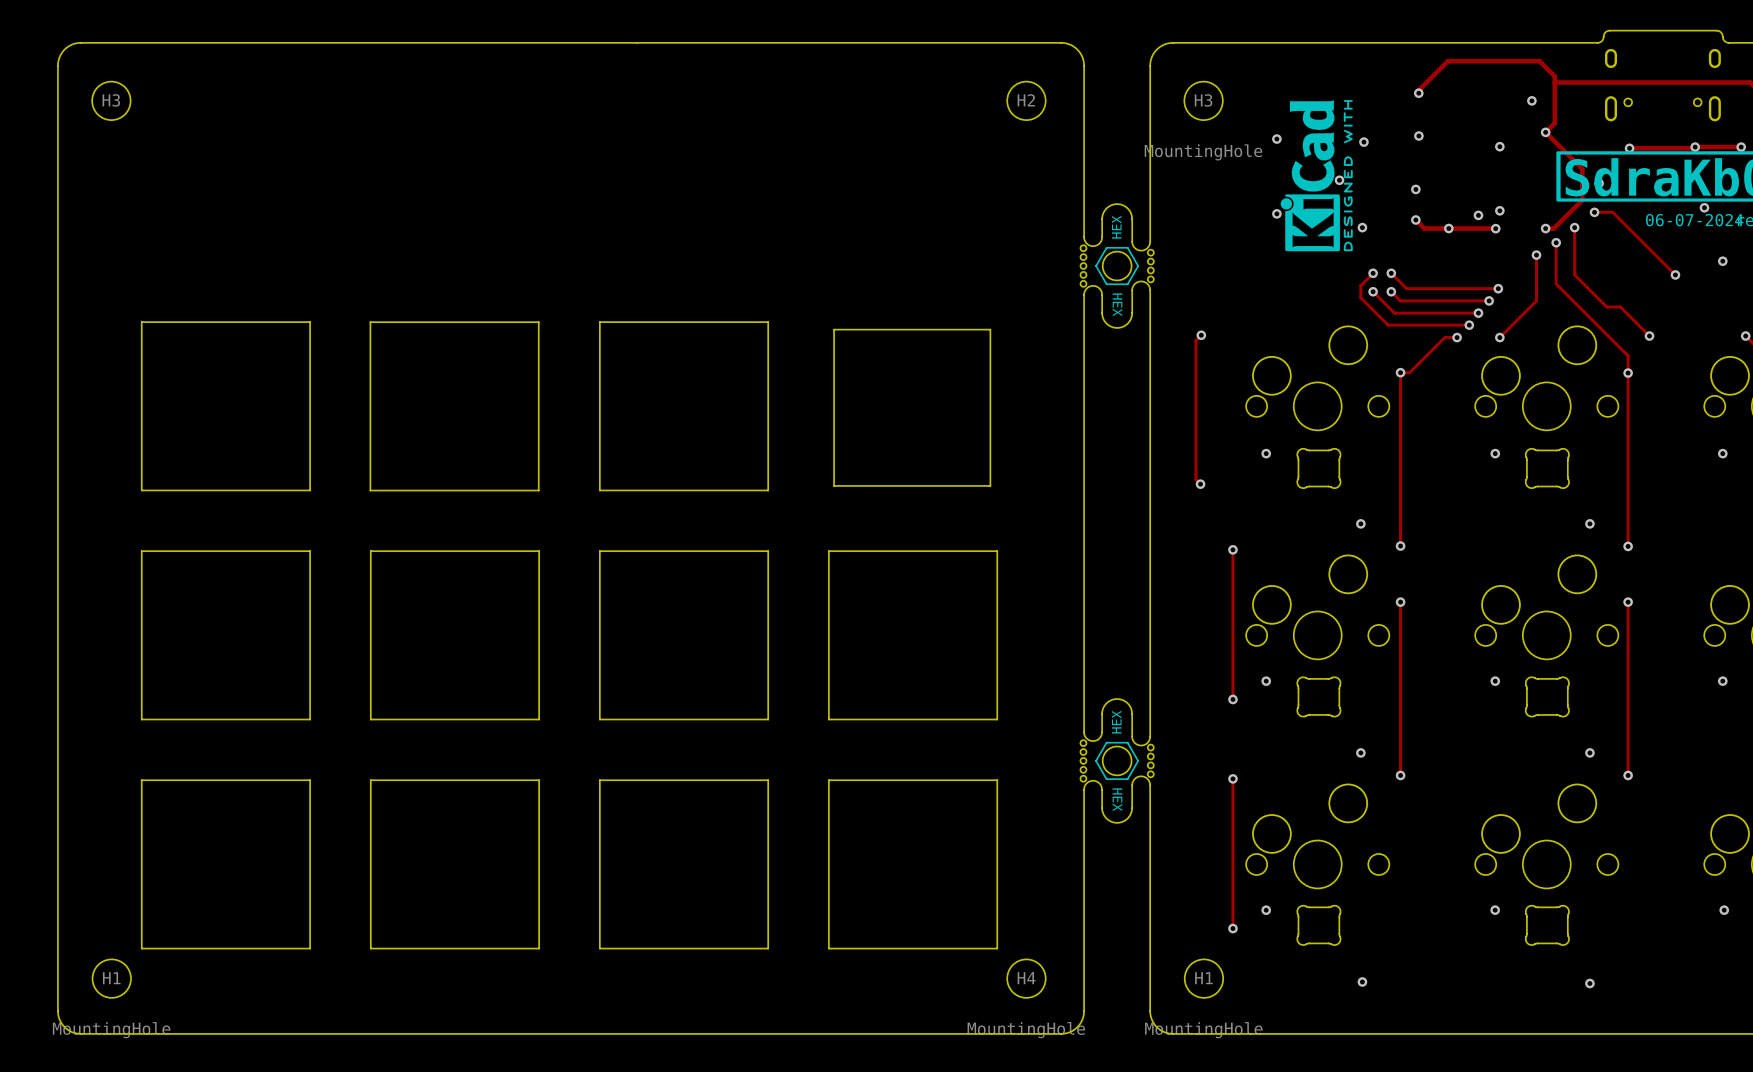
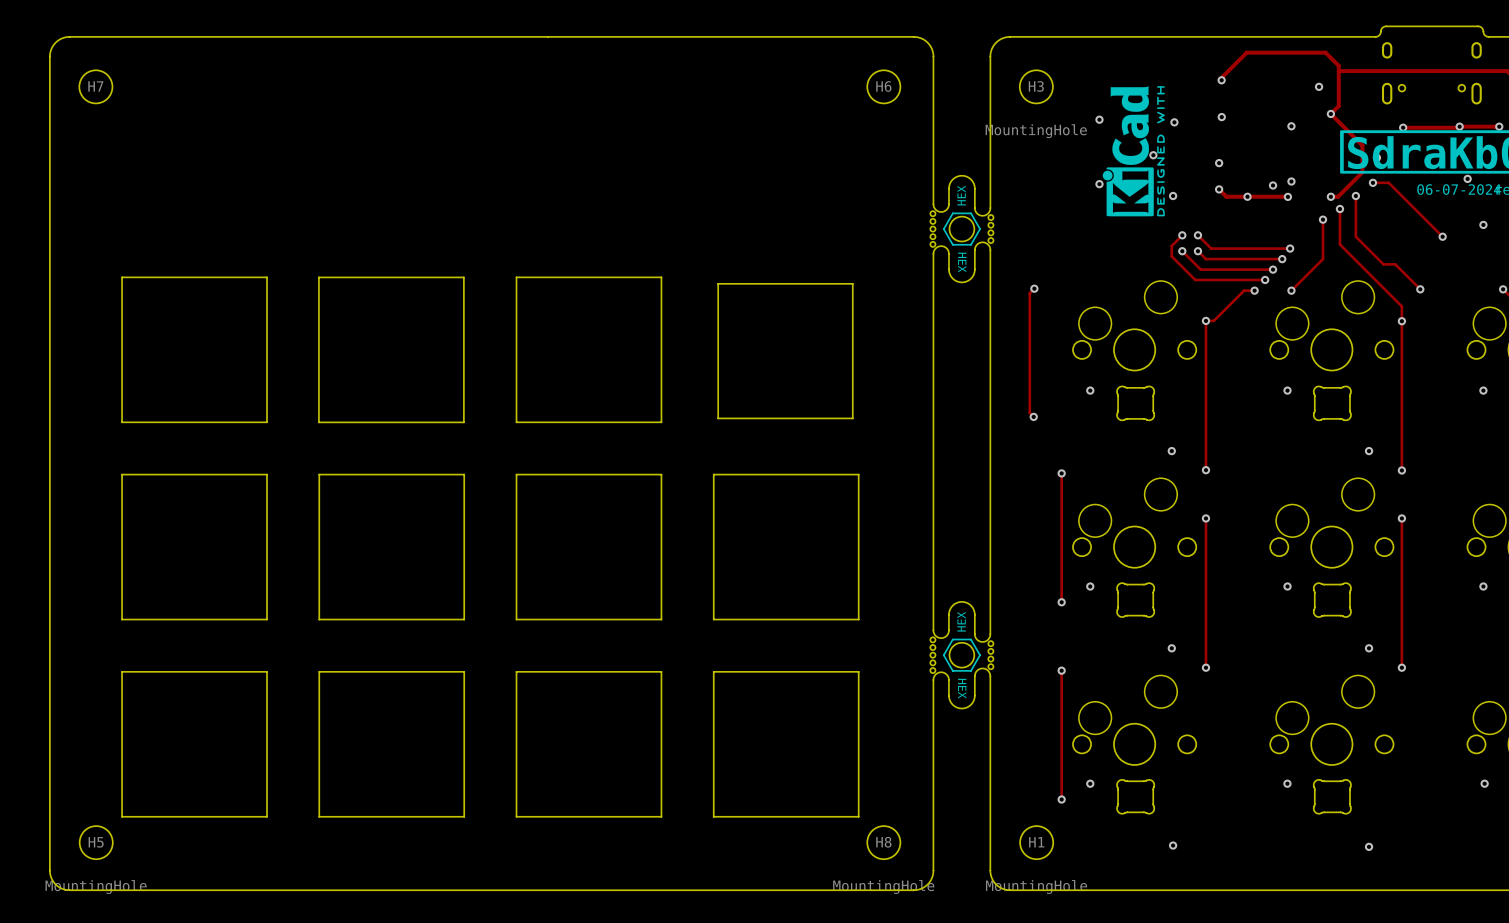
H3 name: H3 (111, 100) -> H7 (95, 86)
H2 name: H2 (1026, 100) -> H6 (883, 86)
H1 name: H1 (111, 978) -> H5 (96, 842)
H4 name: H4 (1026, 978) -> H8 (883, 842)

